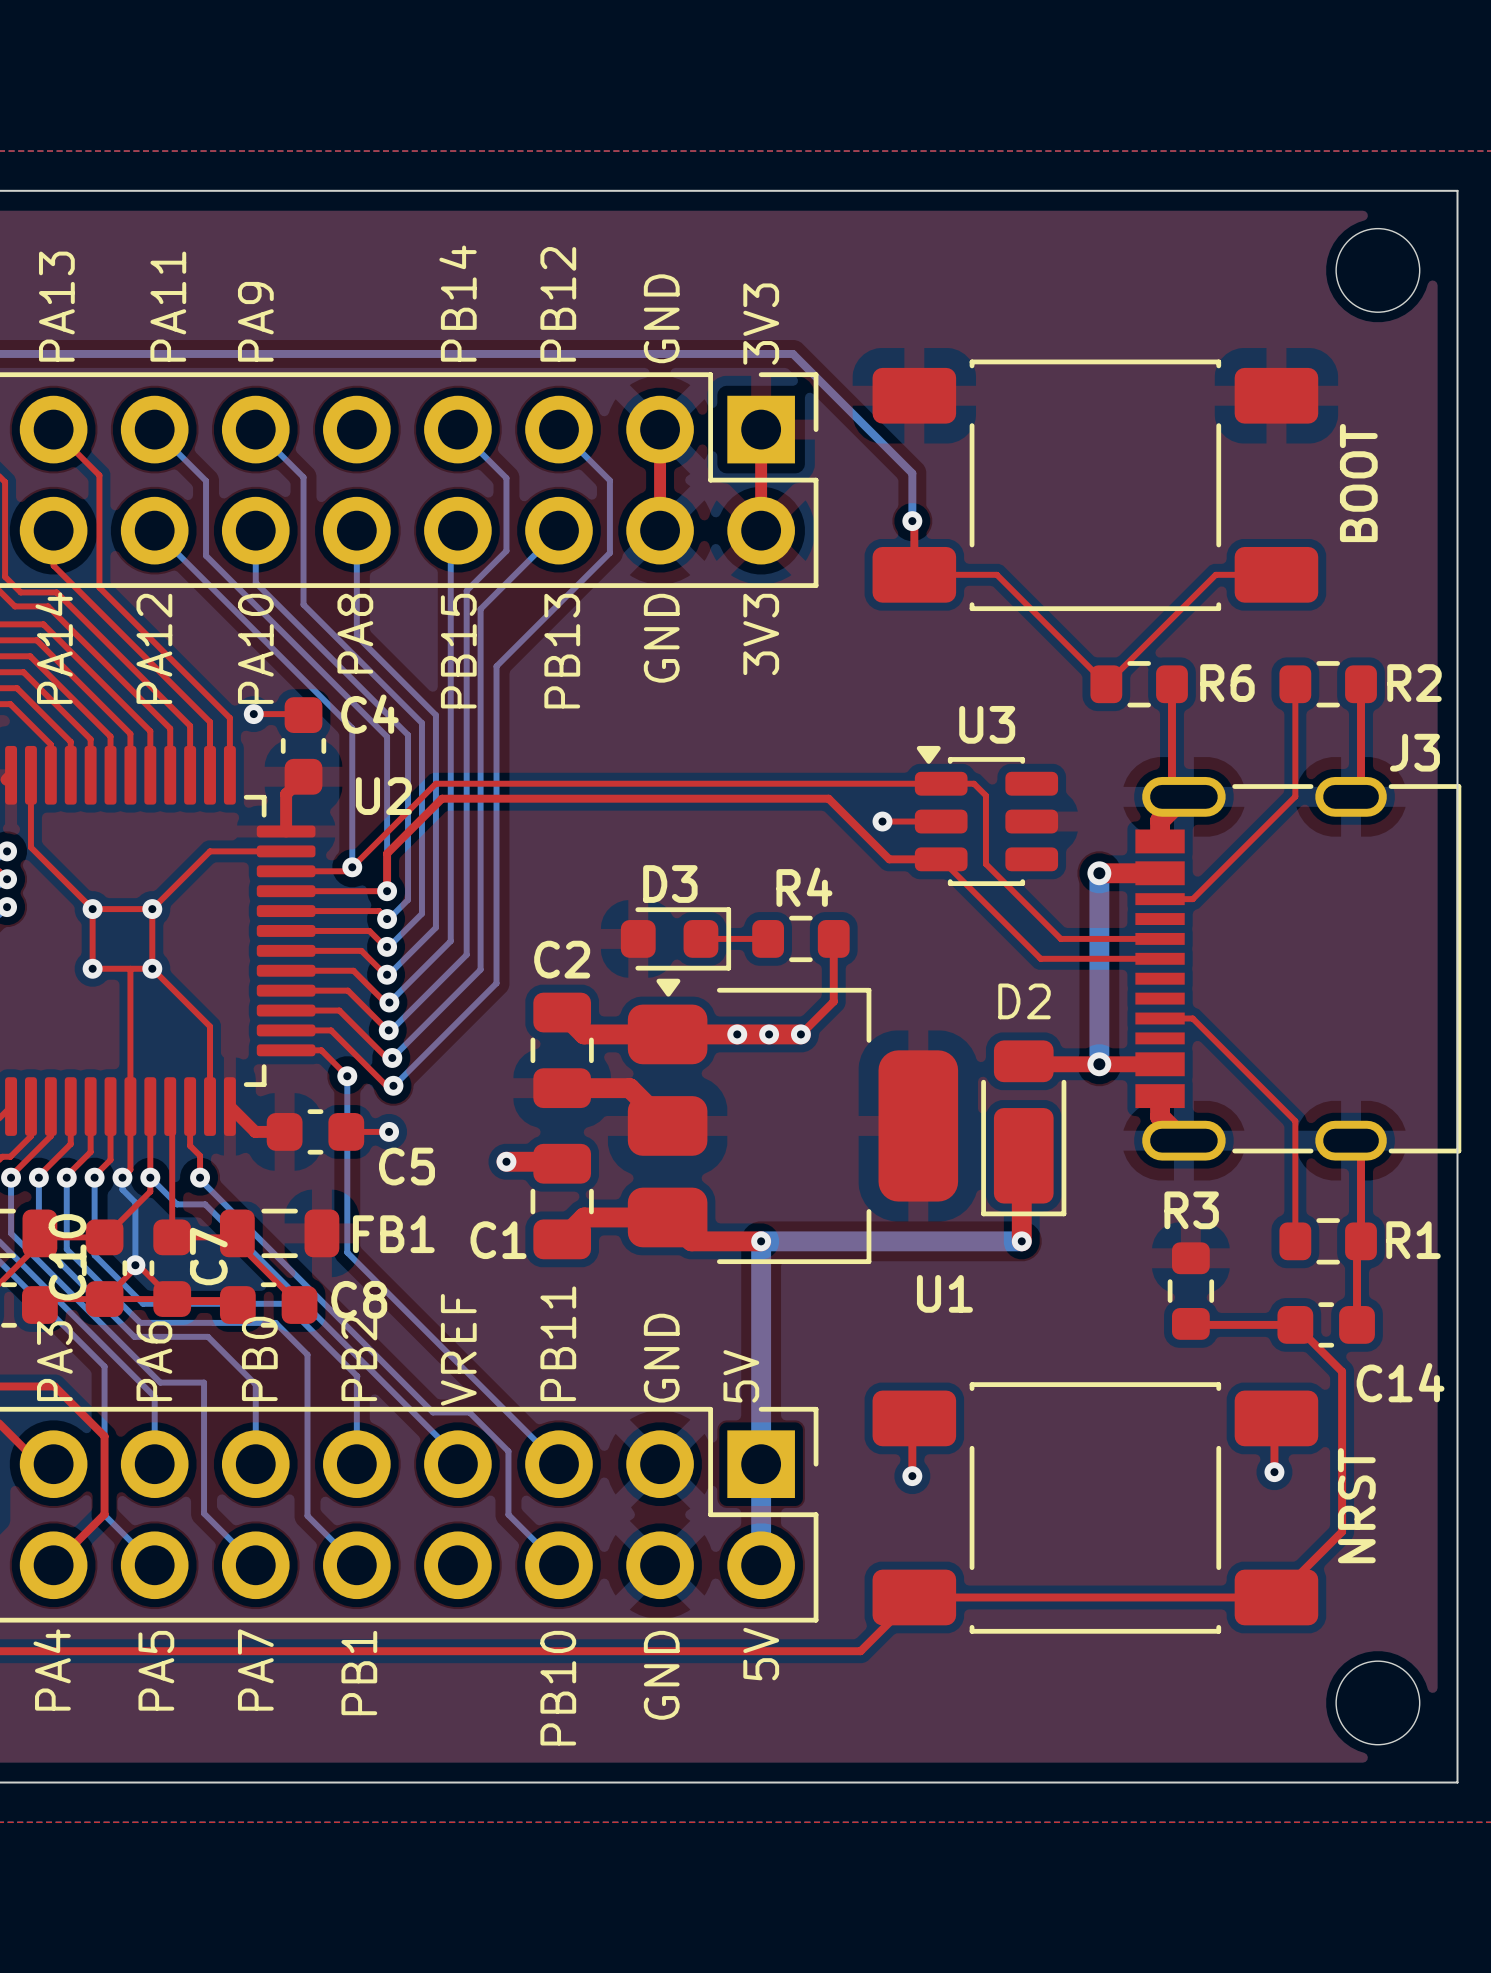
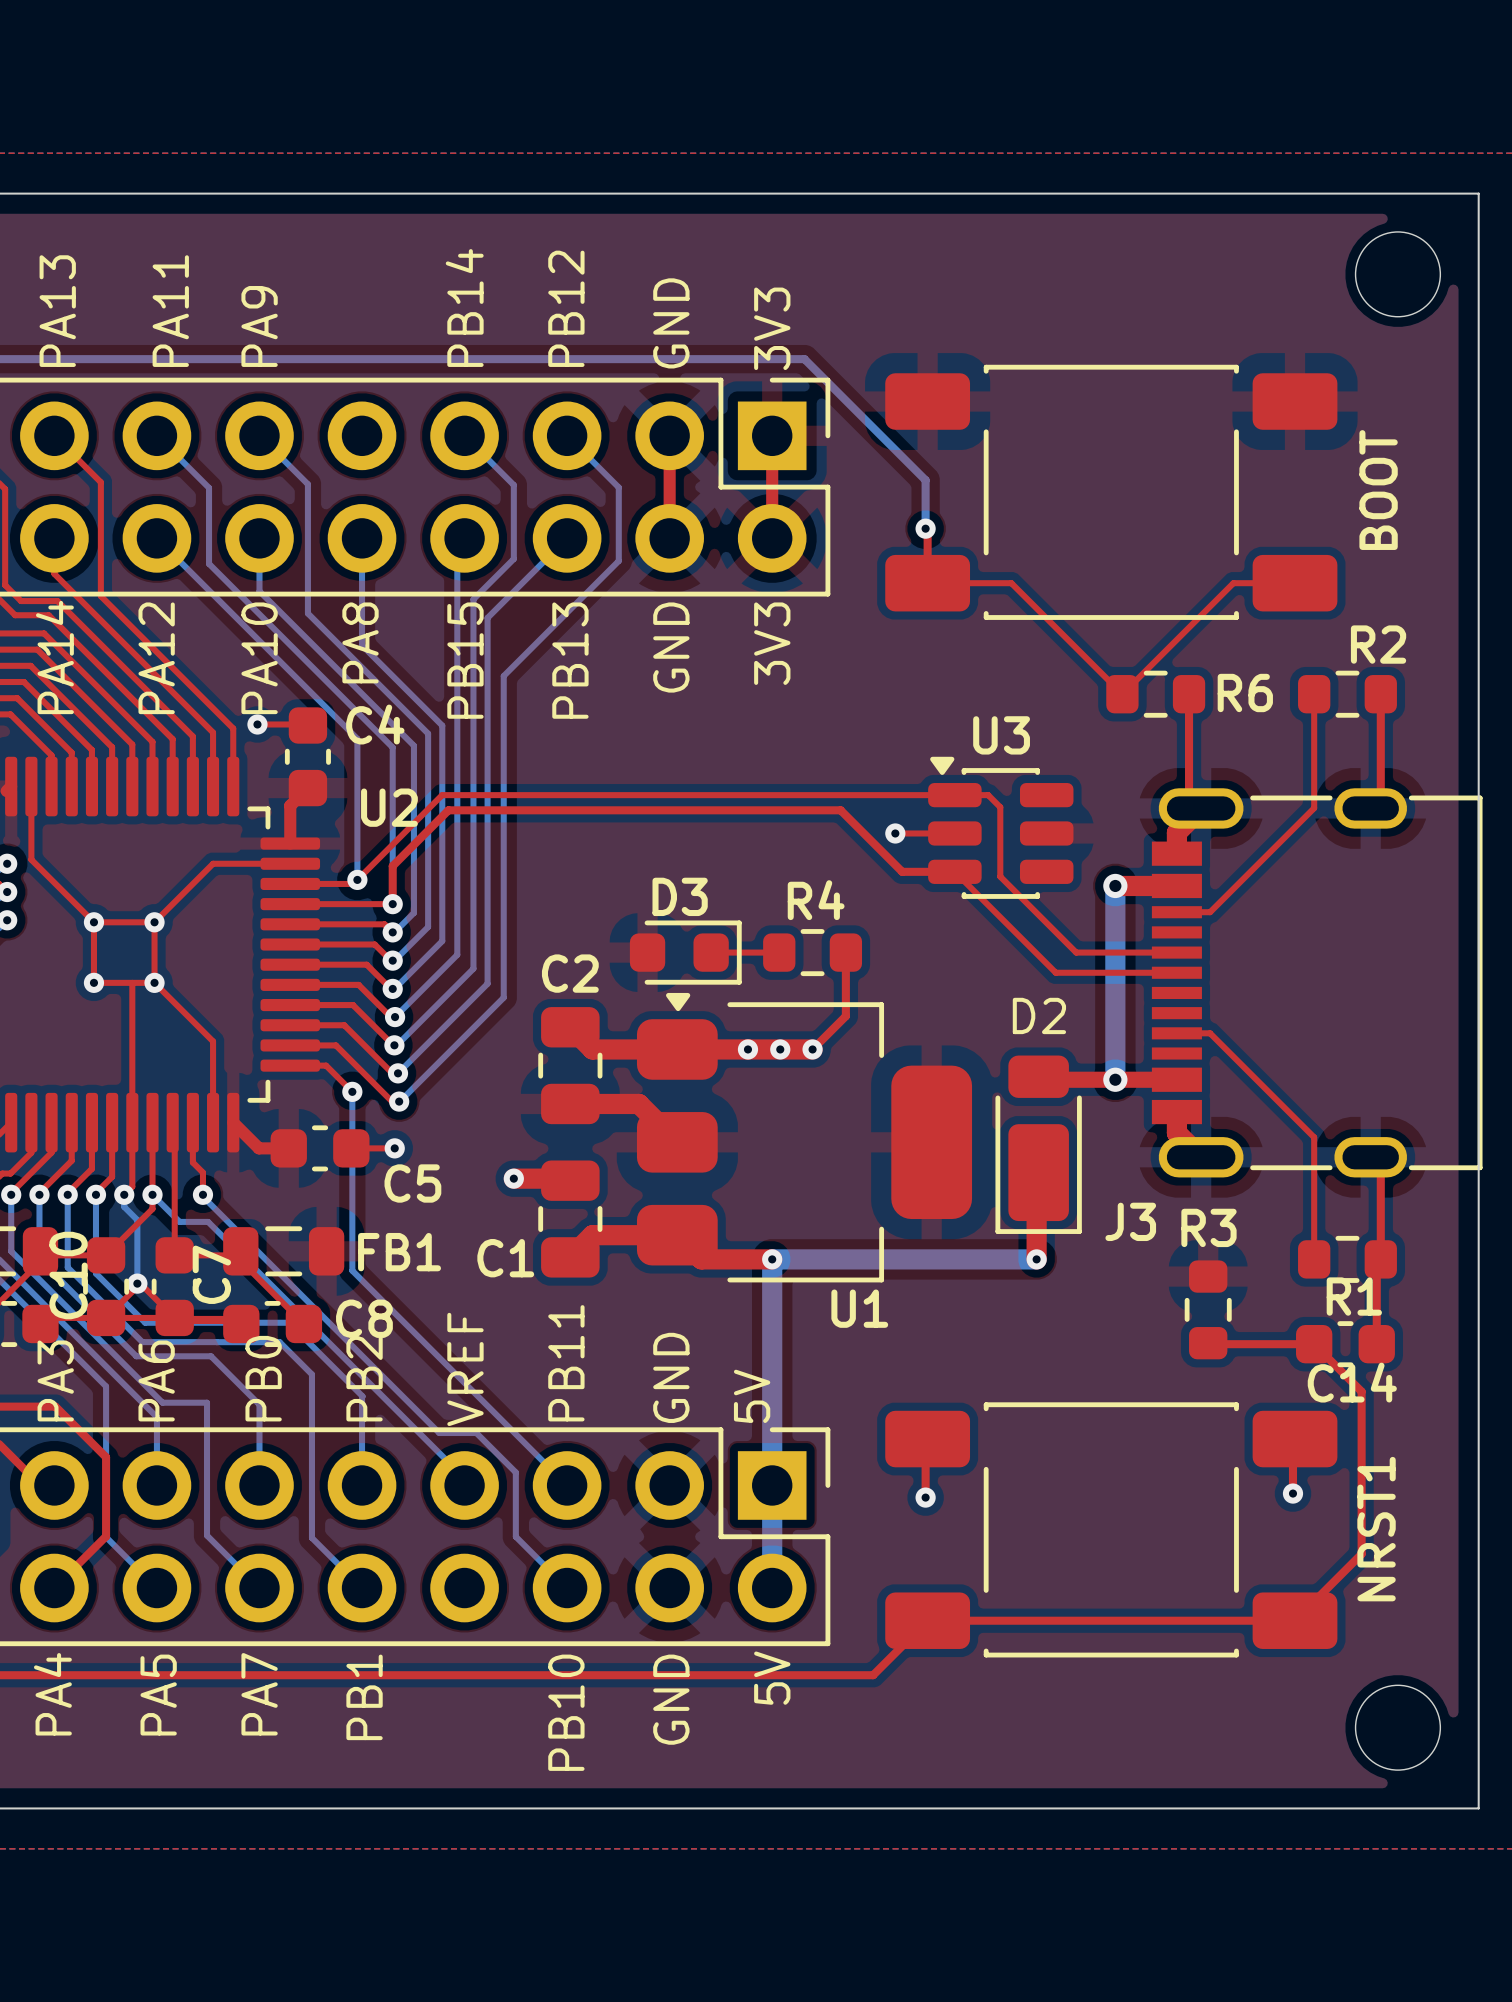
R2 name position: R2 (1414, 683) -> R2 (1378, 644)
J3 name position: J3 (1414, 752) -> J3 (1130, 1221)
R1 name position: R1 (1413, 1240) -> R1 (1354, 1296)
U1 name position: U1 (944, 1293) -> U1 (859, 1308)
C14 name position: C14 (1400, 1382) -> C14 (1352, 1382)
NRST name: NRST (1356, 1505) -> NRST1 (1376, 1529)

